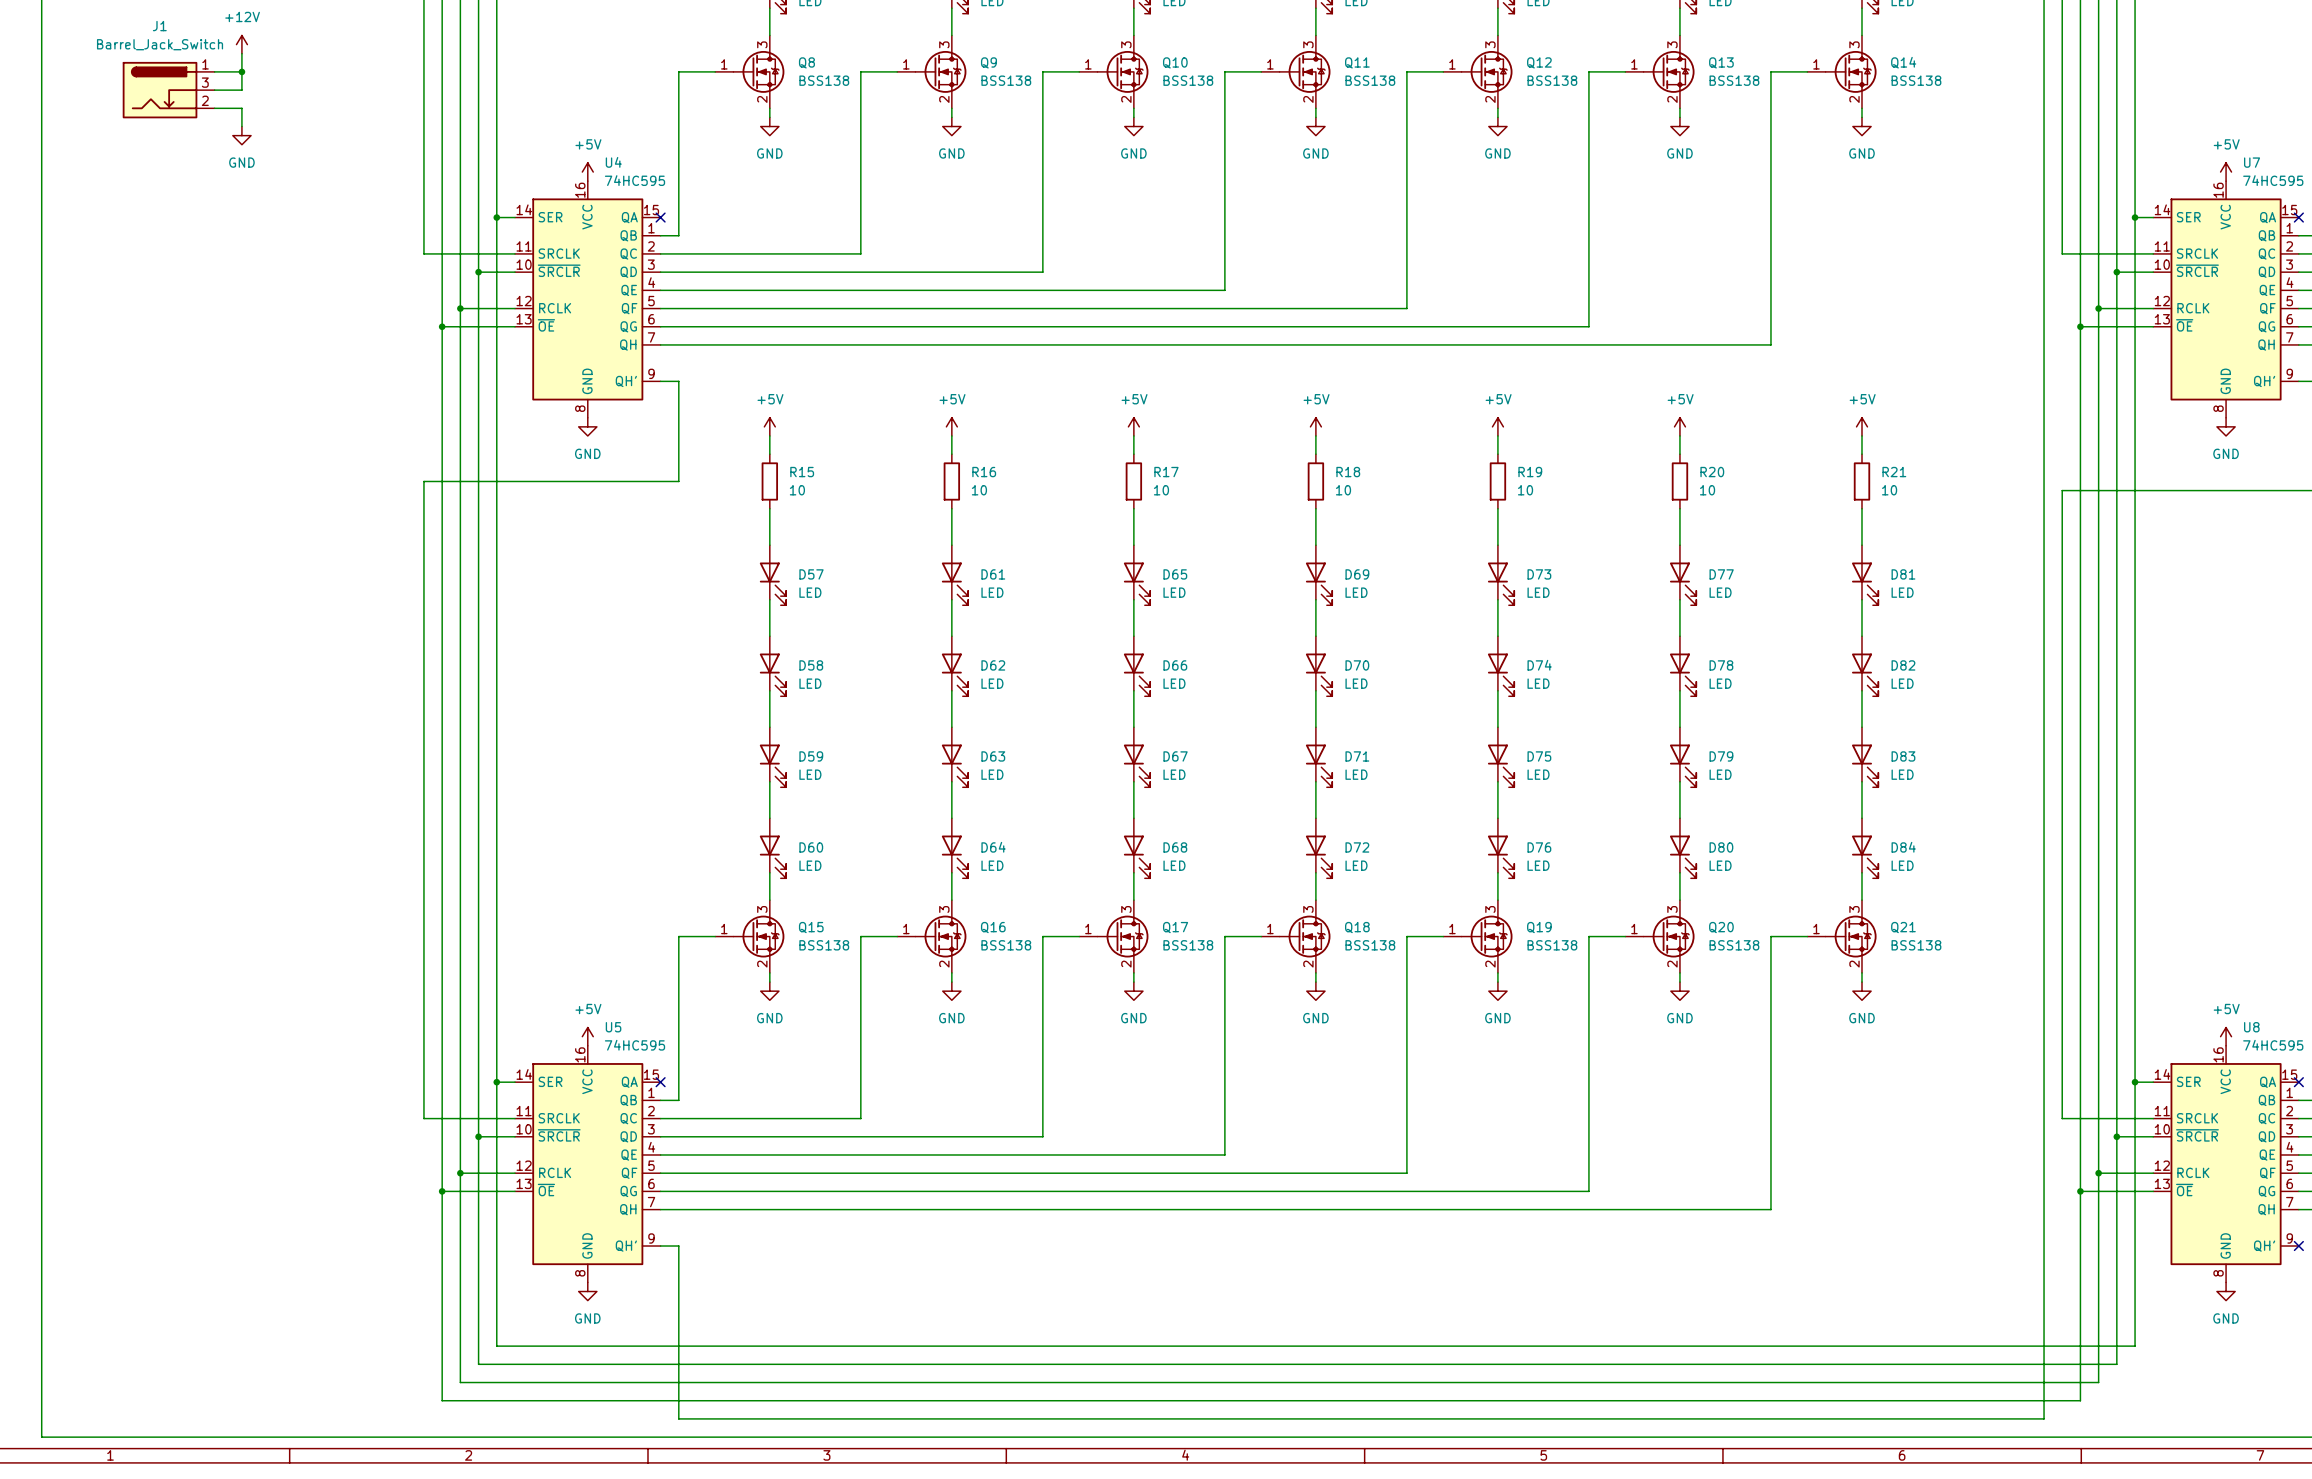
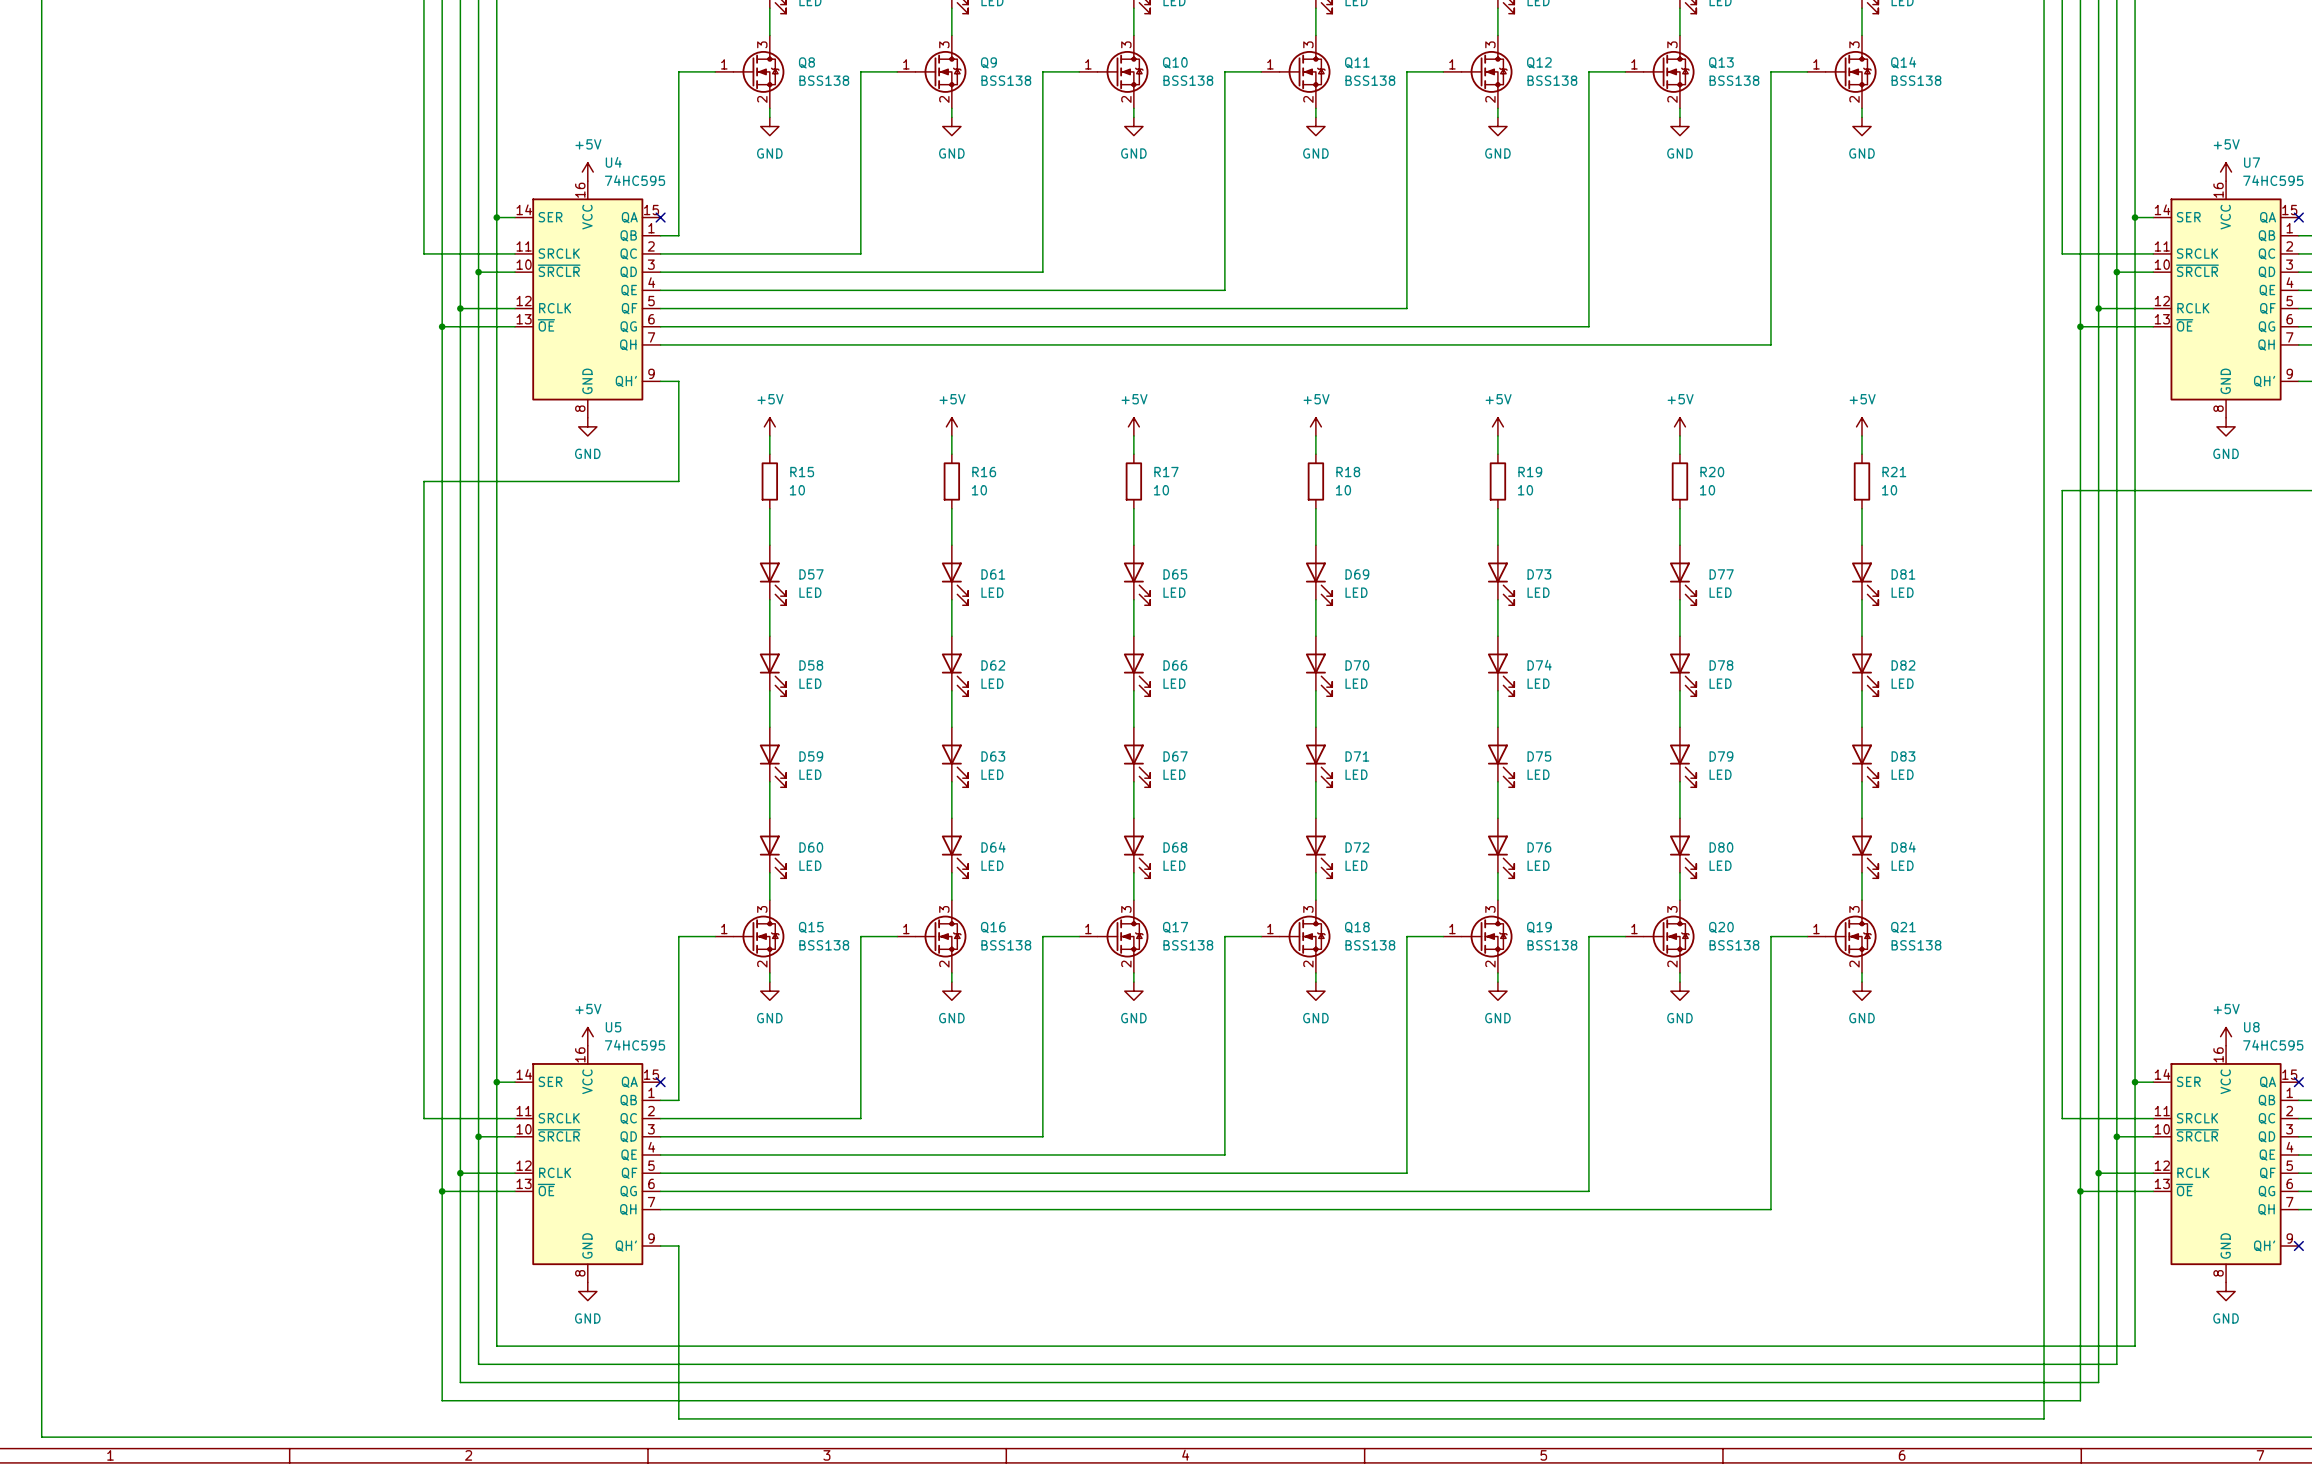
power symbol: +12V (241, 44) -> none
wire: (241, 53) (241, 90) (214, 90) -> none
wire: (214, 71) (241, 71) -> none
junction: (241, 71) -> none
J1: Barrel_Jack_Switch (168, 90) -> none
wire: (214, 108) (241, 108) (241, 126) -> none
power symbol: GND (241, 135) -> none

